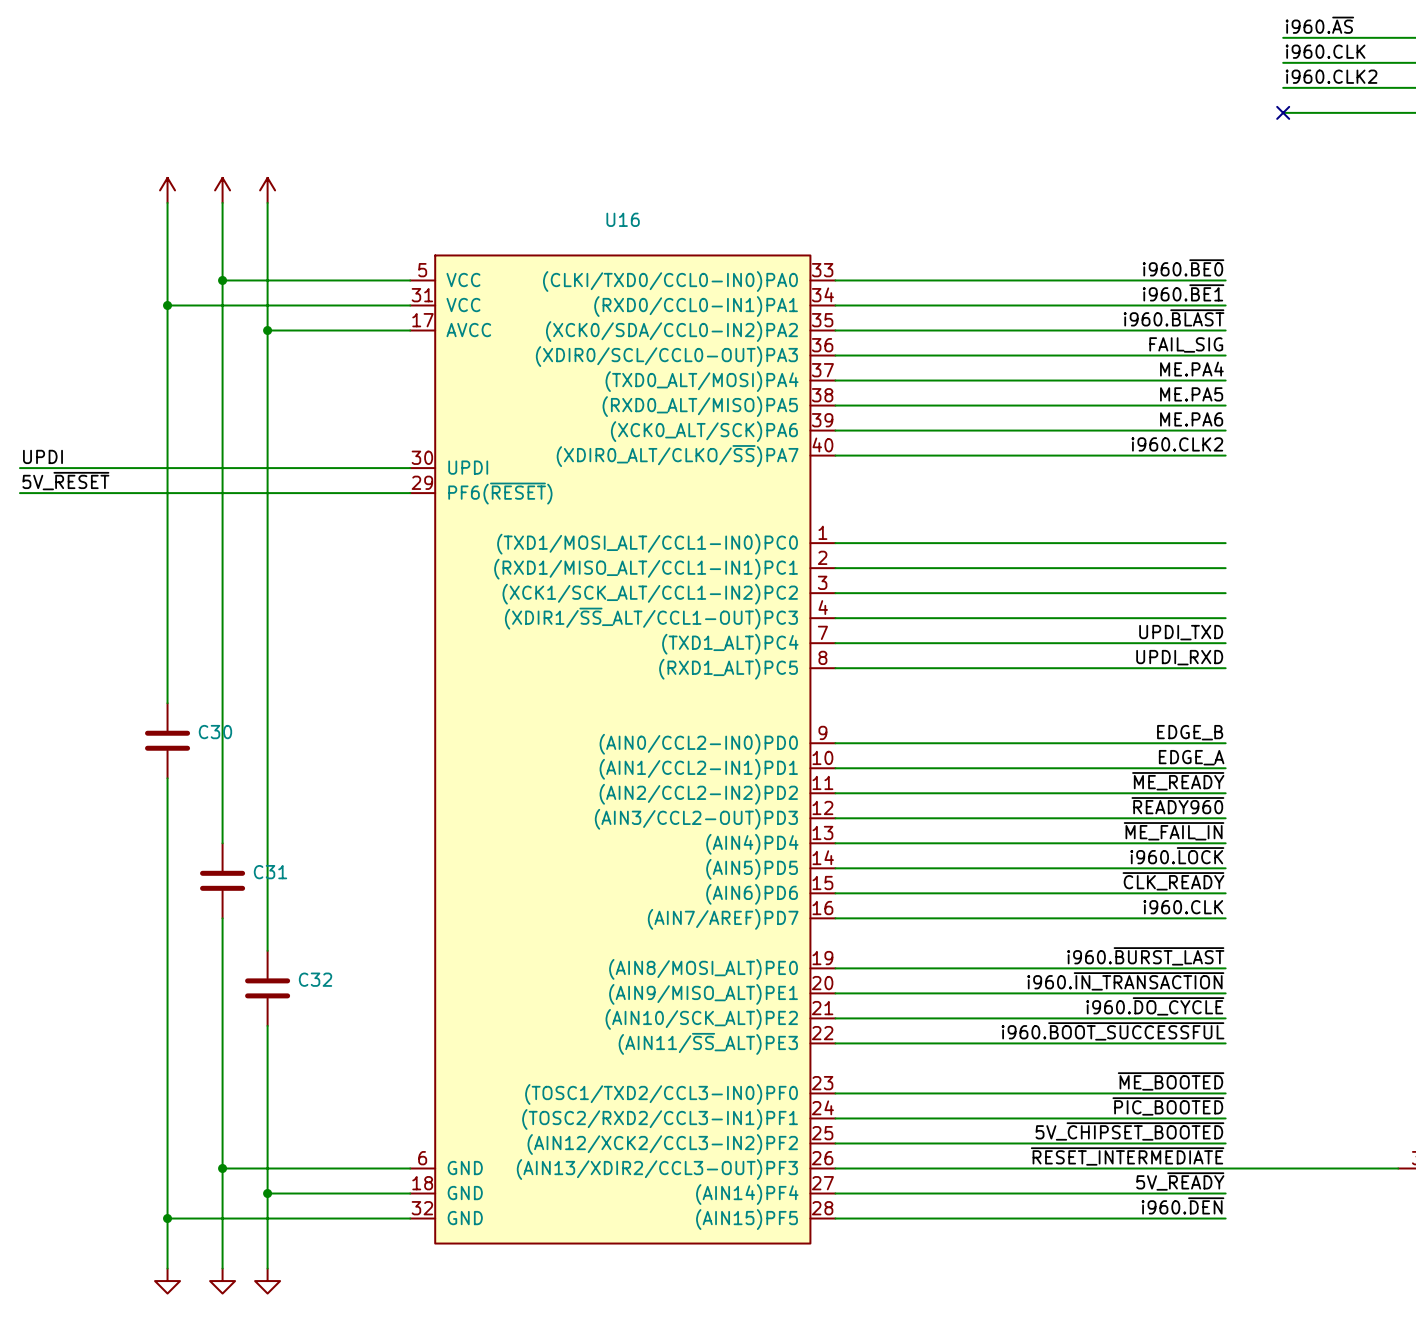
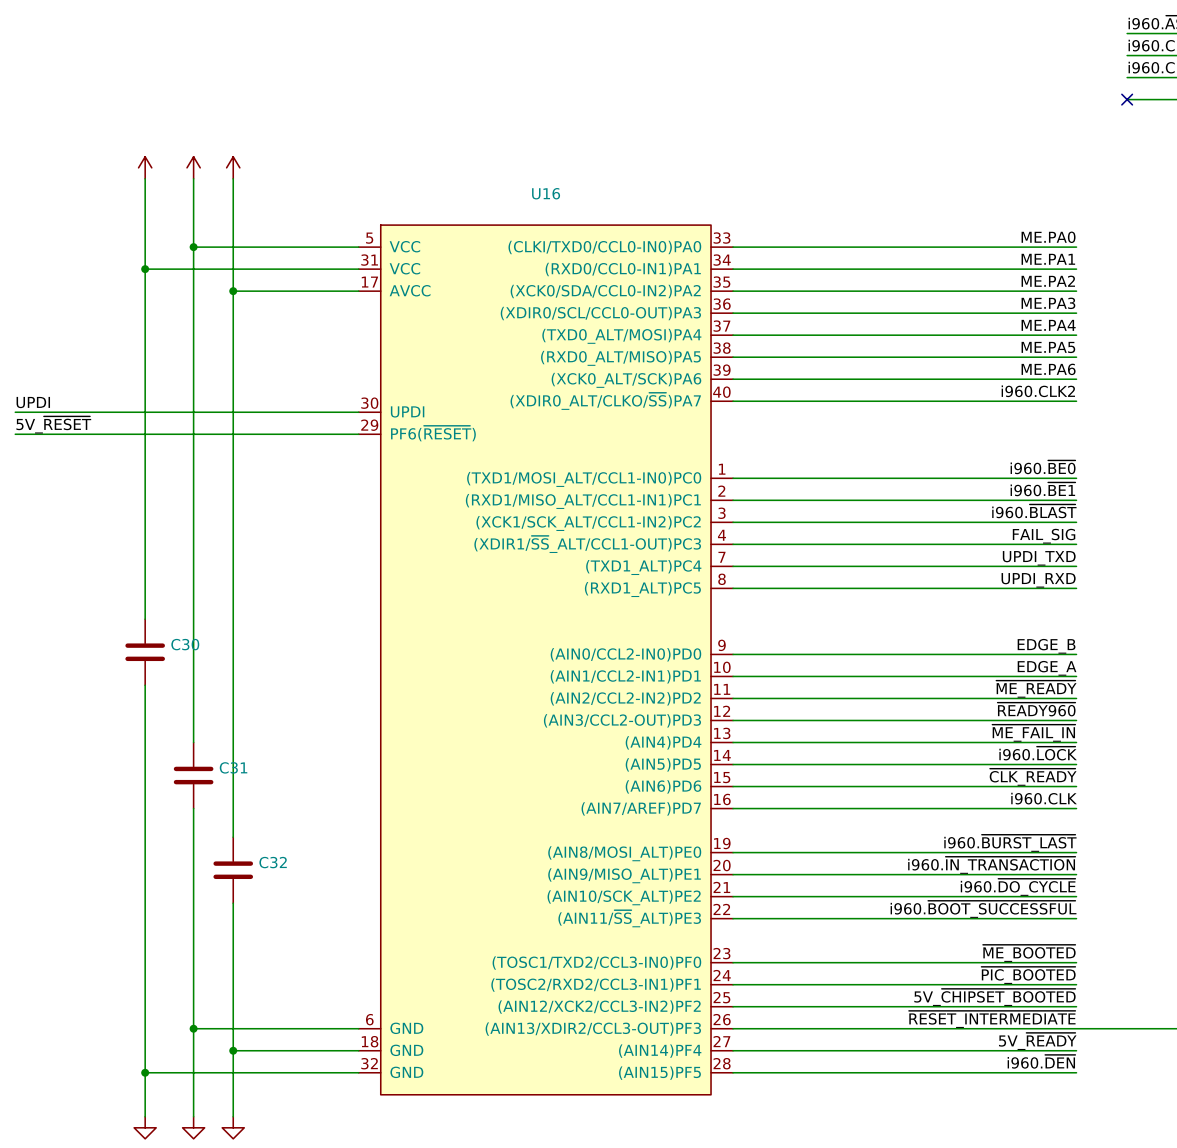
label: i960.~{BE0} (1183, 267) -> ME.PA0 (1048, 237)
label: i960.~{BE1} (1183, 292) -> ME.PA1 (1048, 259)
label: i960.~{BLAST} (1174, 317) -> ME.PA2 (1048, 281)
label: FAIL_SIG (1186, 344) -> ME.PA3 (1048, 303)
label: none -> i960.~{BE0} (1043, 467)
label: none -> i960.~{BE1} (1043, 489)
label: none -> i960.~{BLAST} (1034, 511)
label: none -> FAIL_SIG (1044, 536)

